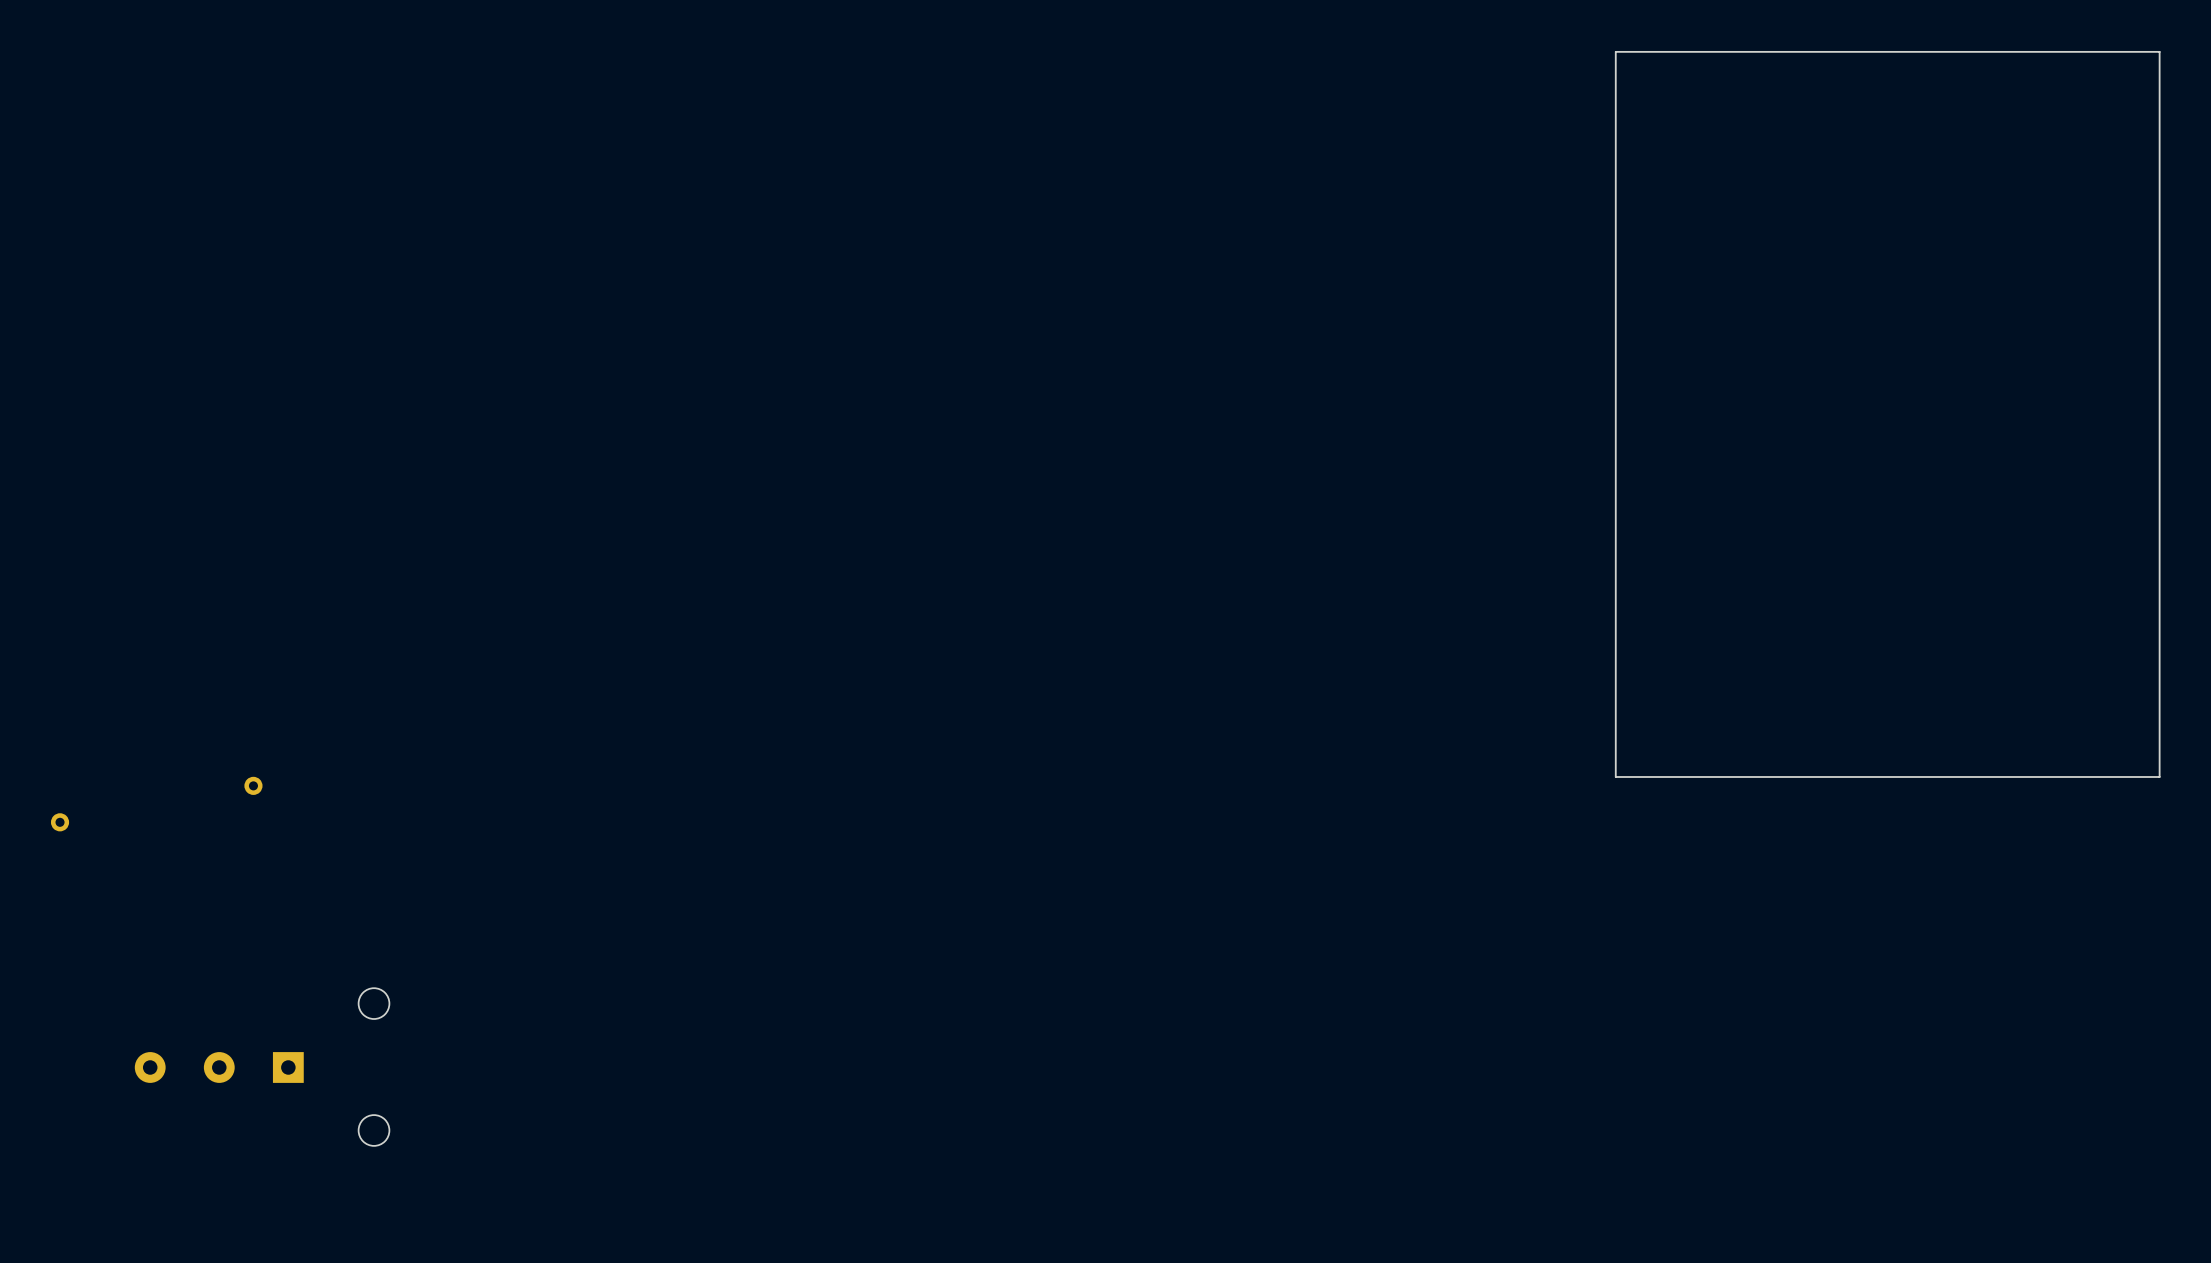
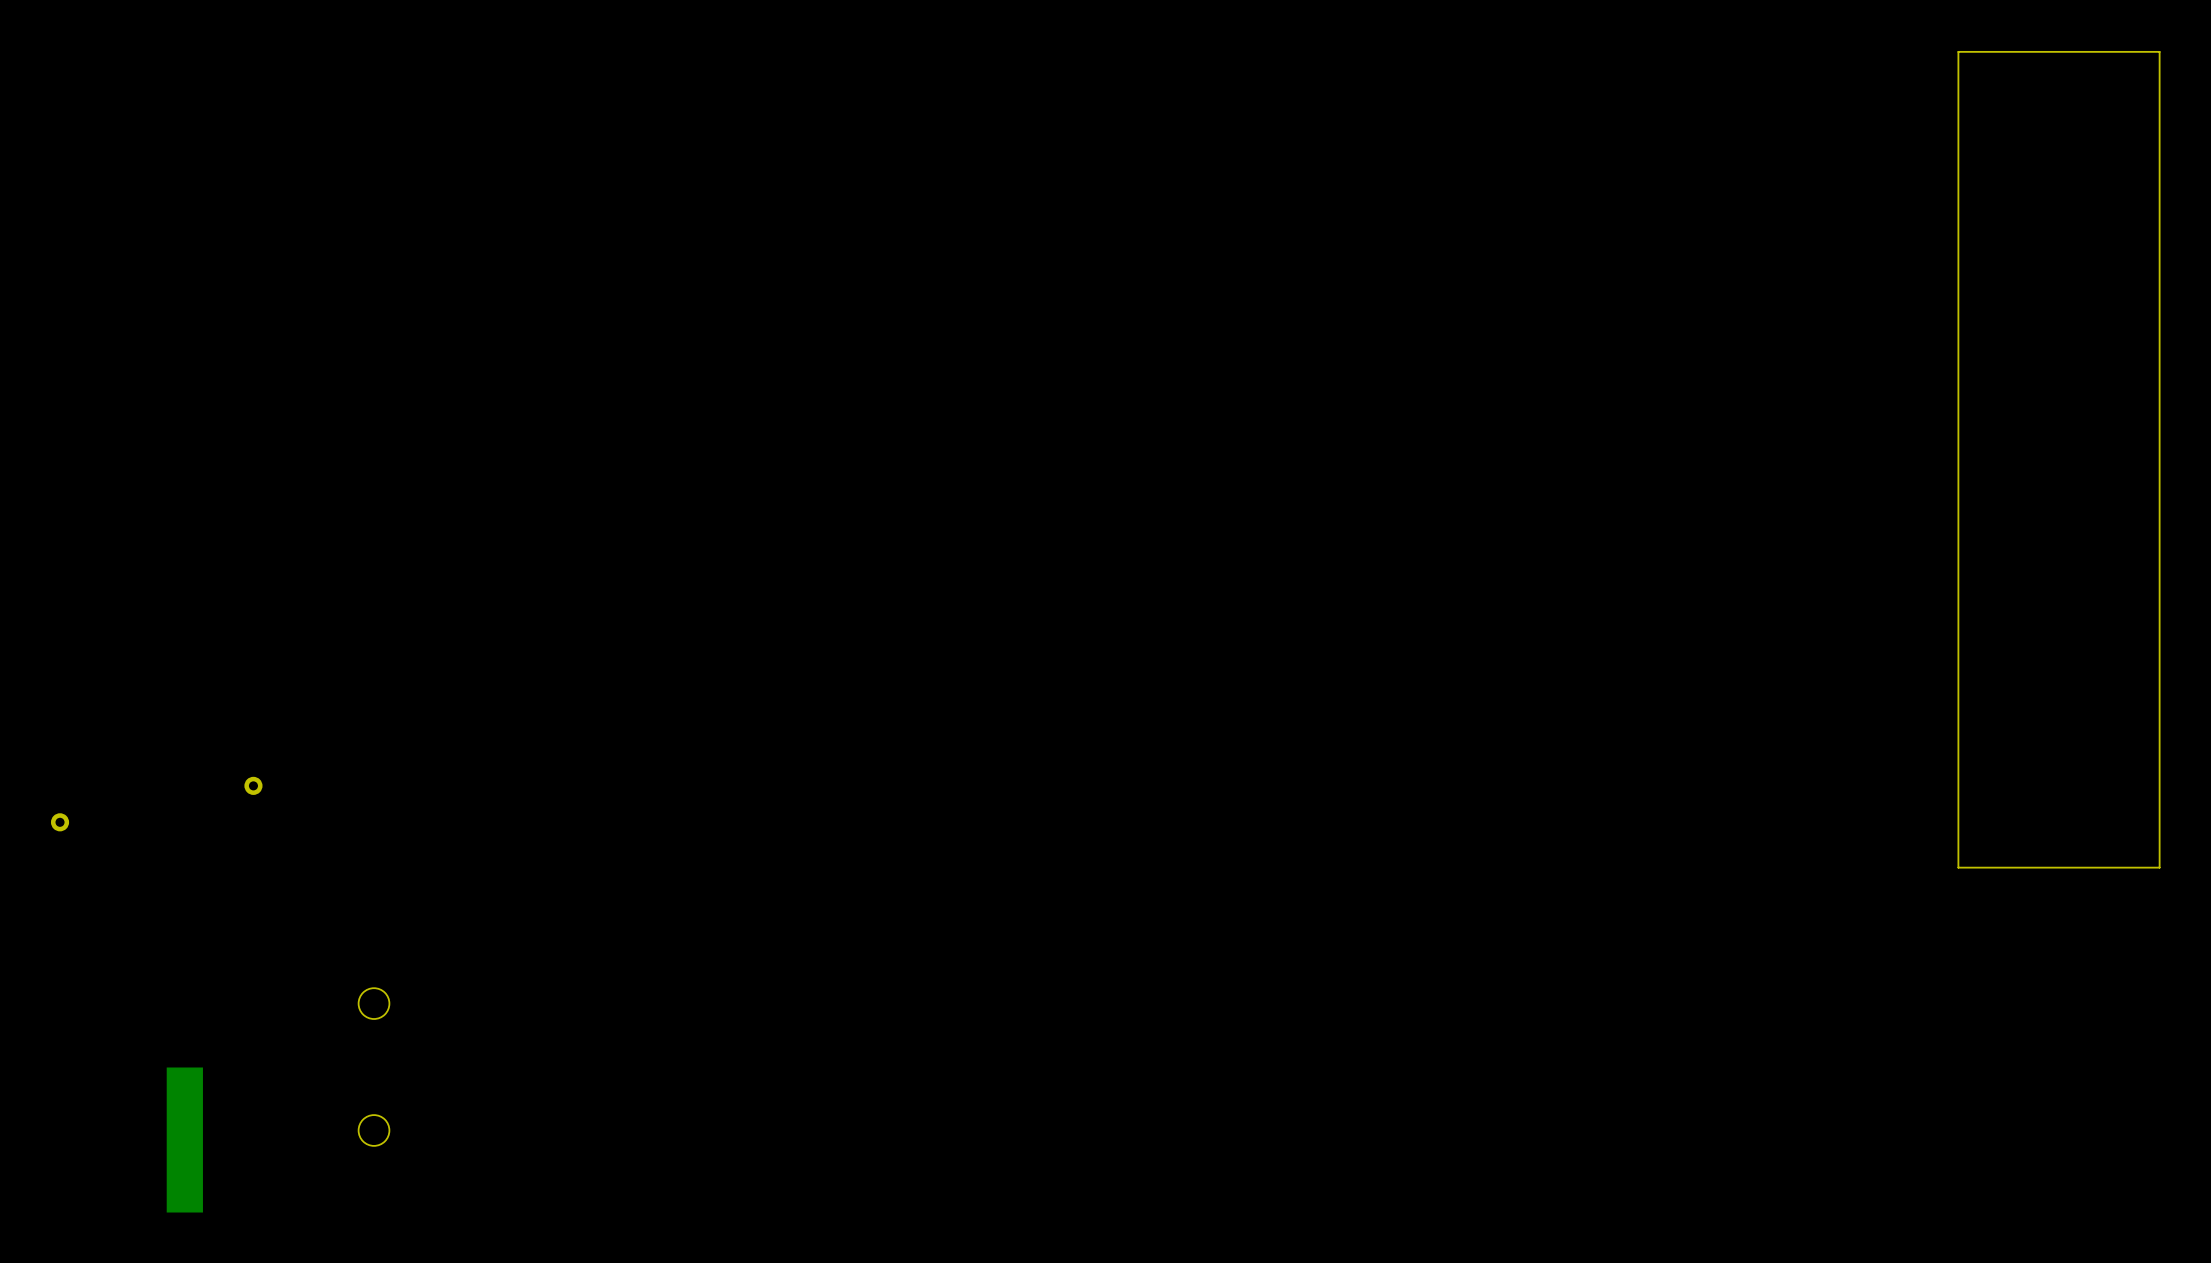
board edge: (1958, 51) (1615, 51) (1615, 776) (2159, 776) -> (1958, 51) (1958, 867) (2159, 867) (2159, 776)
part: (219, 1067) -> none
part: none -> (184, 1140)

